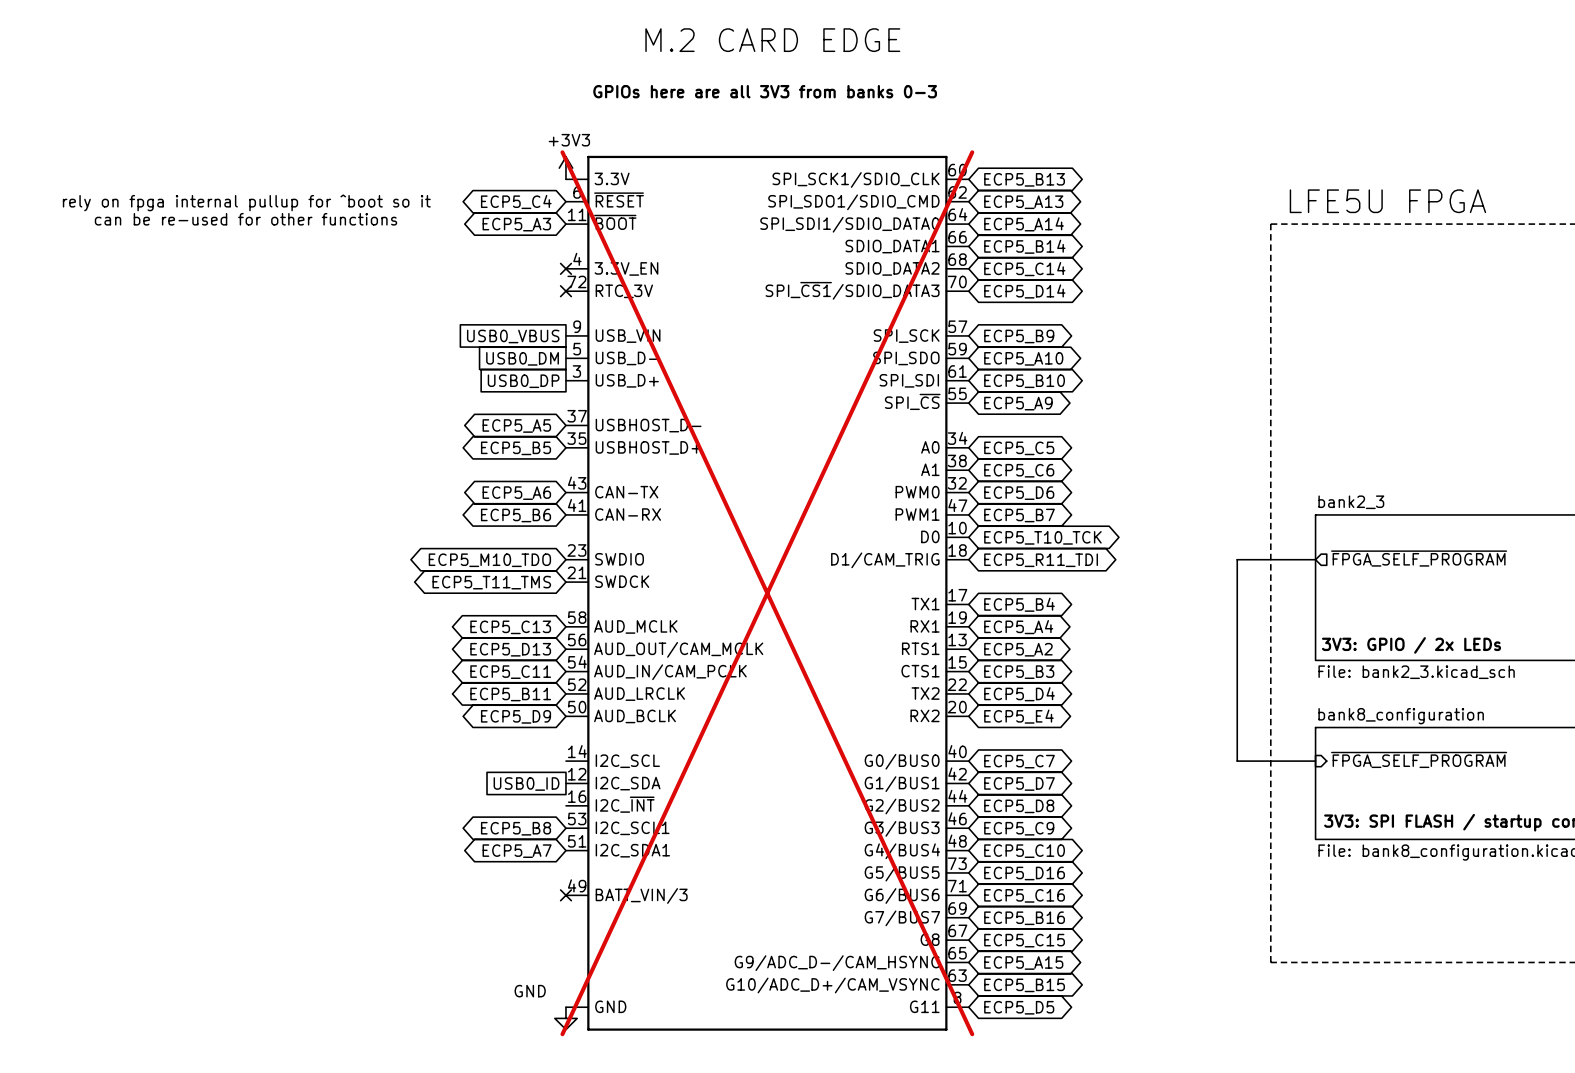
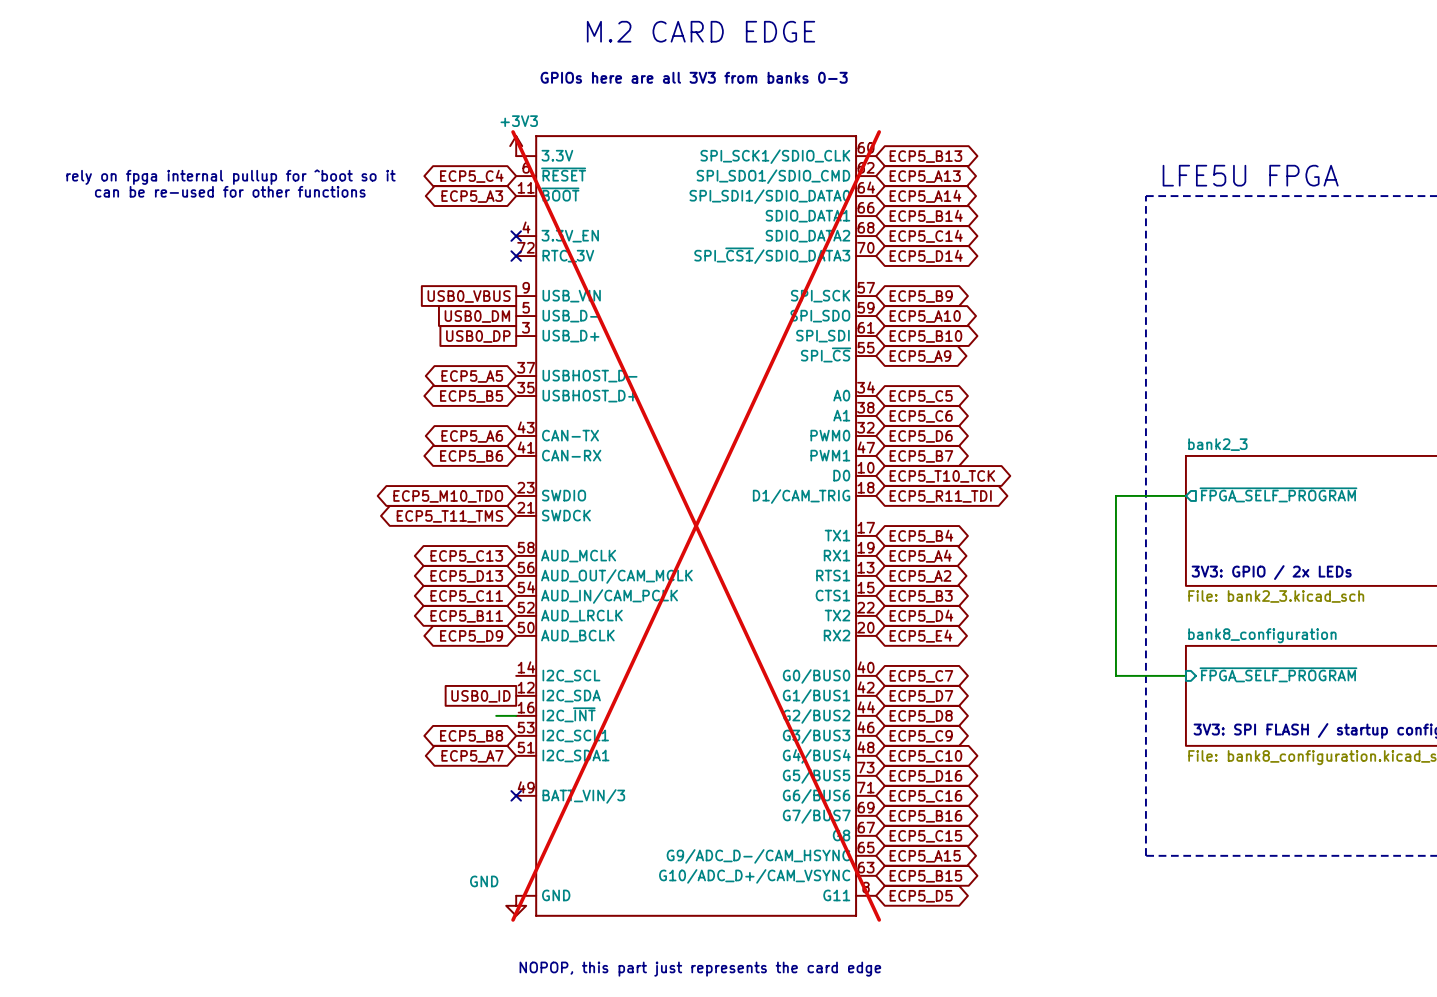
wire: none -> (496, 715) (516, 715)

